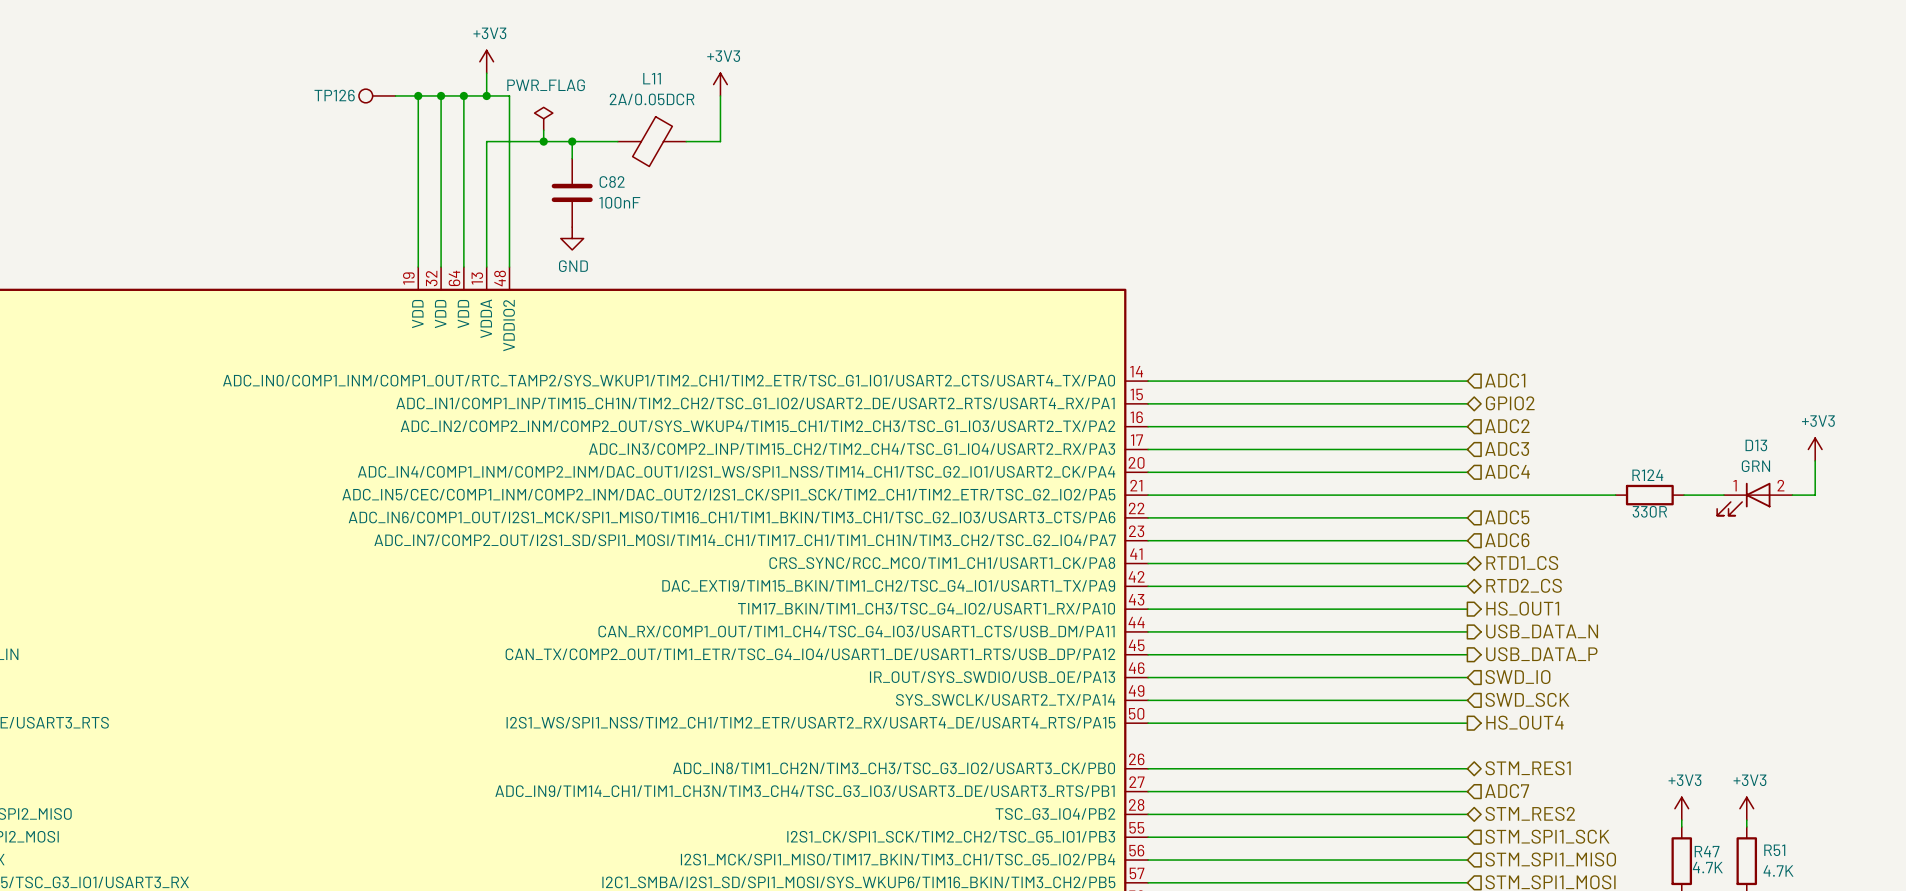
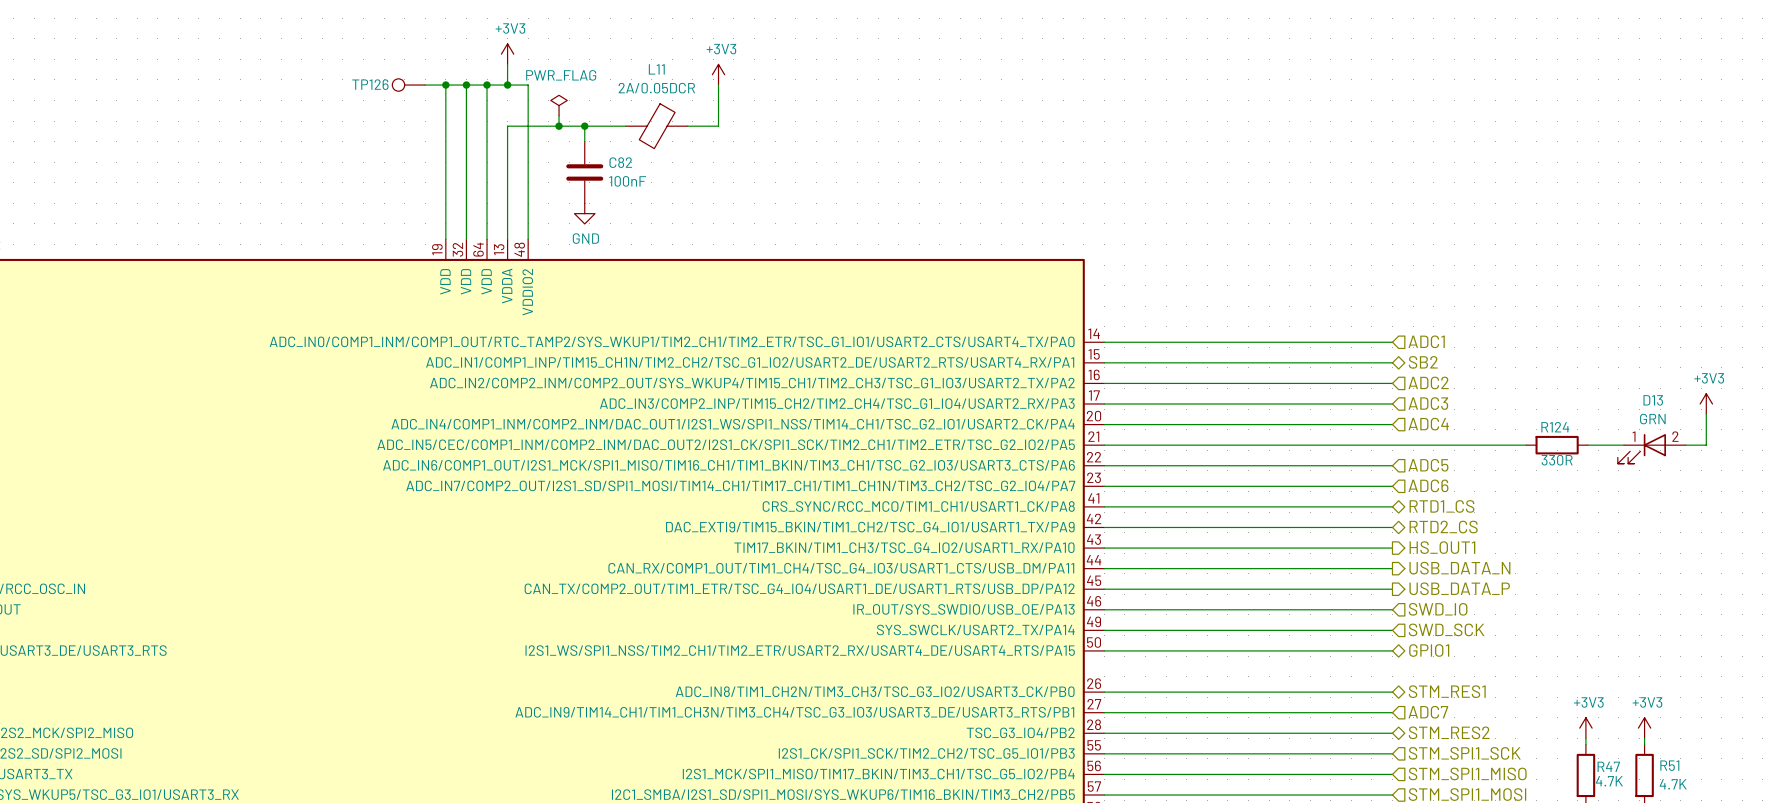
hierarchical label: GPIO2 (1510, 403) -> SB2 (1423, 362)
hierarchical label shape: output (1525, 722) -> bidirectional (1429, 650)
hierarchical label: HS_OUT4 (1525, 722) -> GPIO1 (1429, 650)

